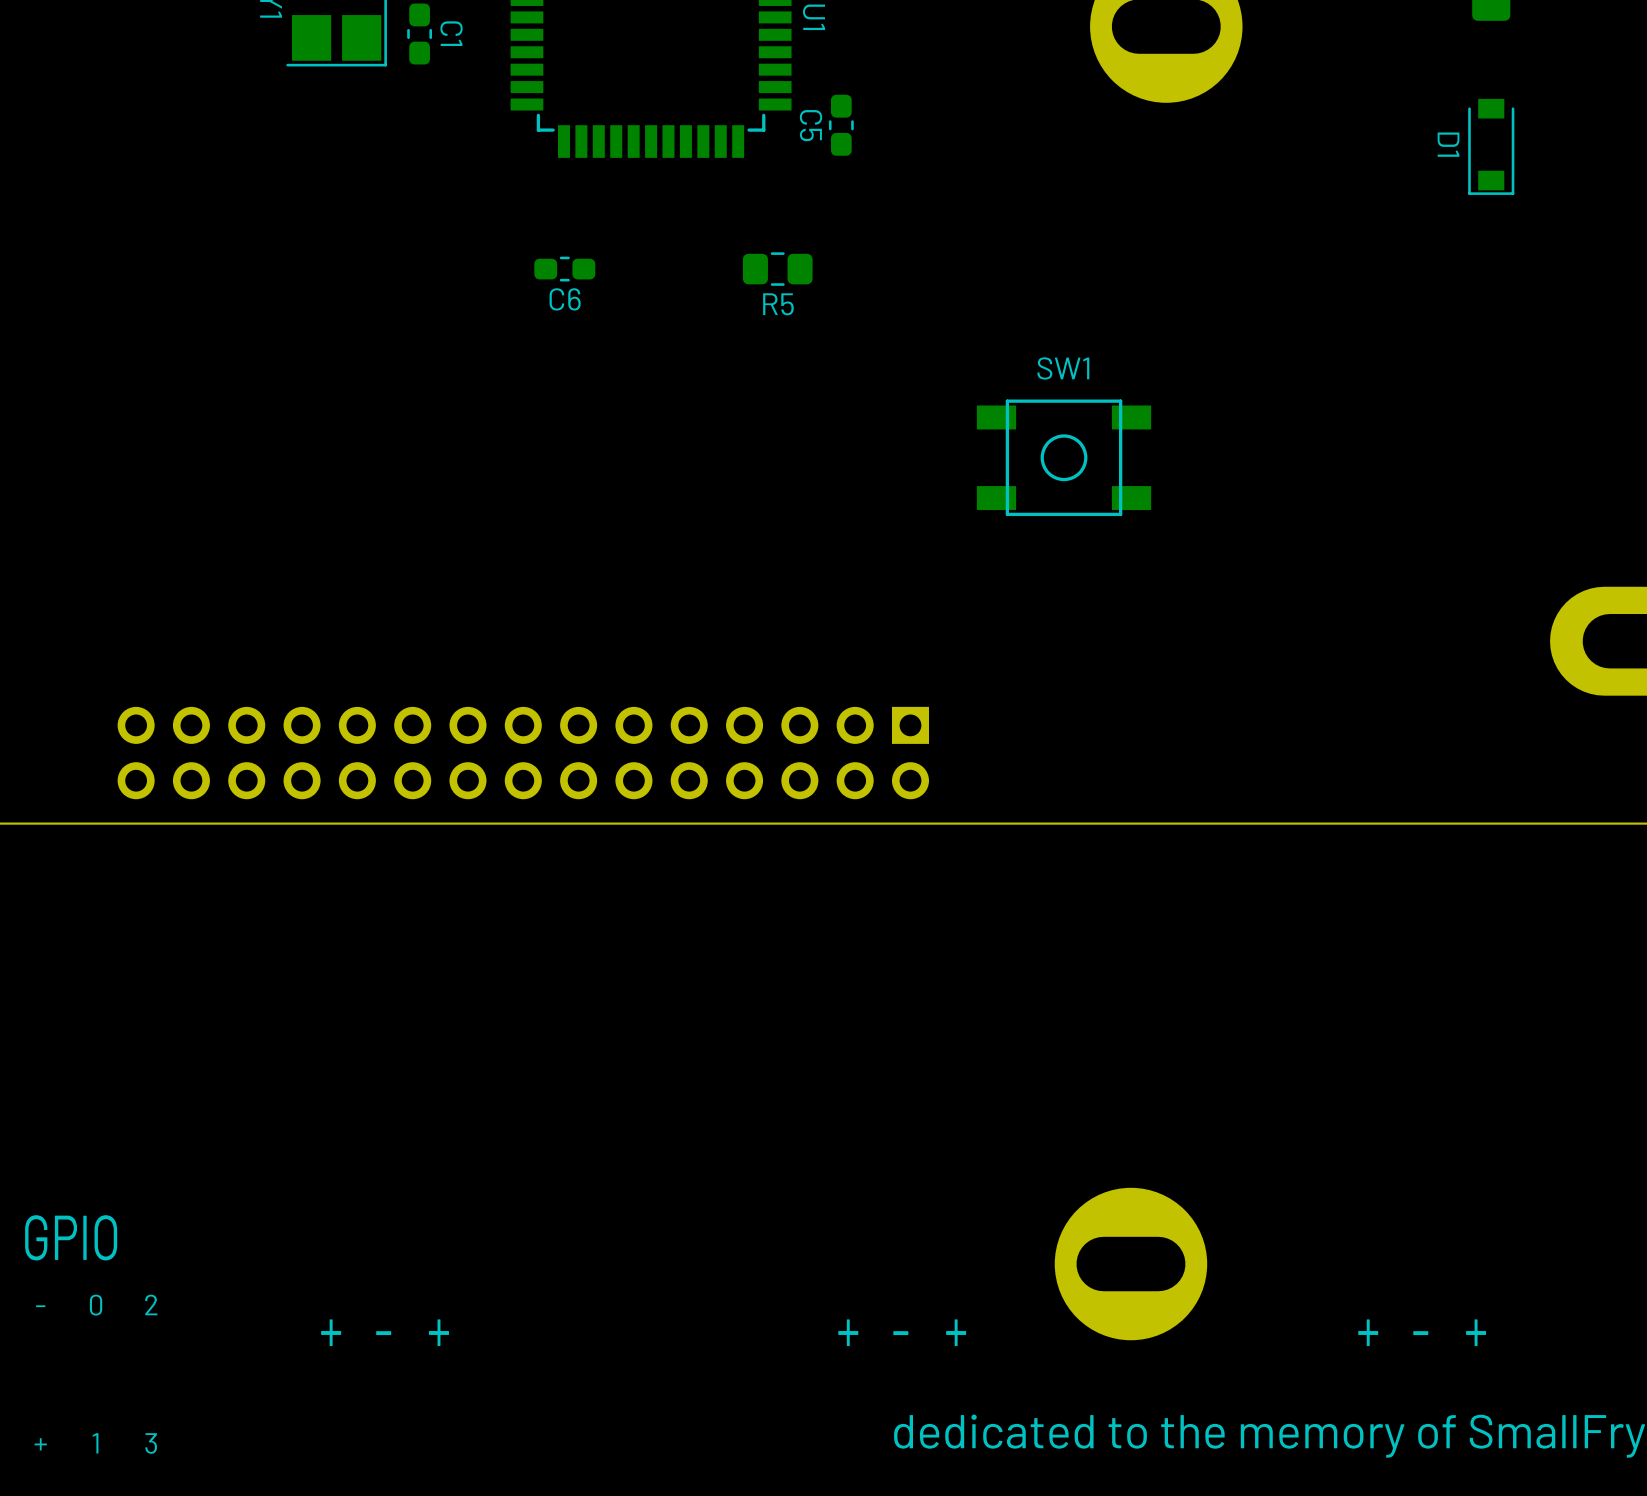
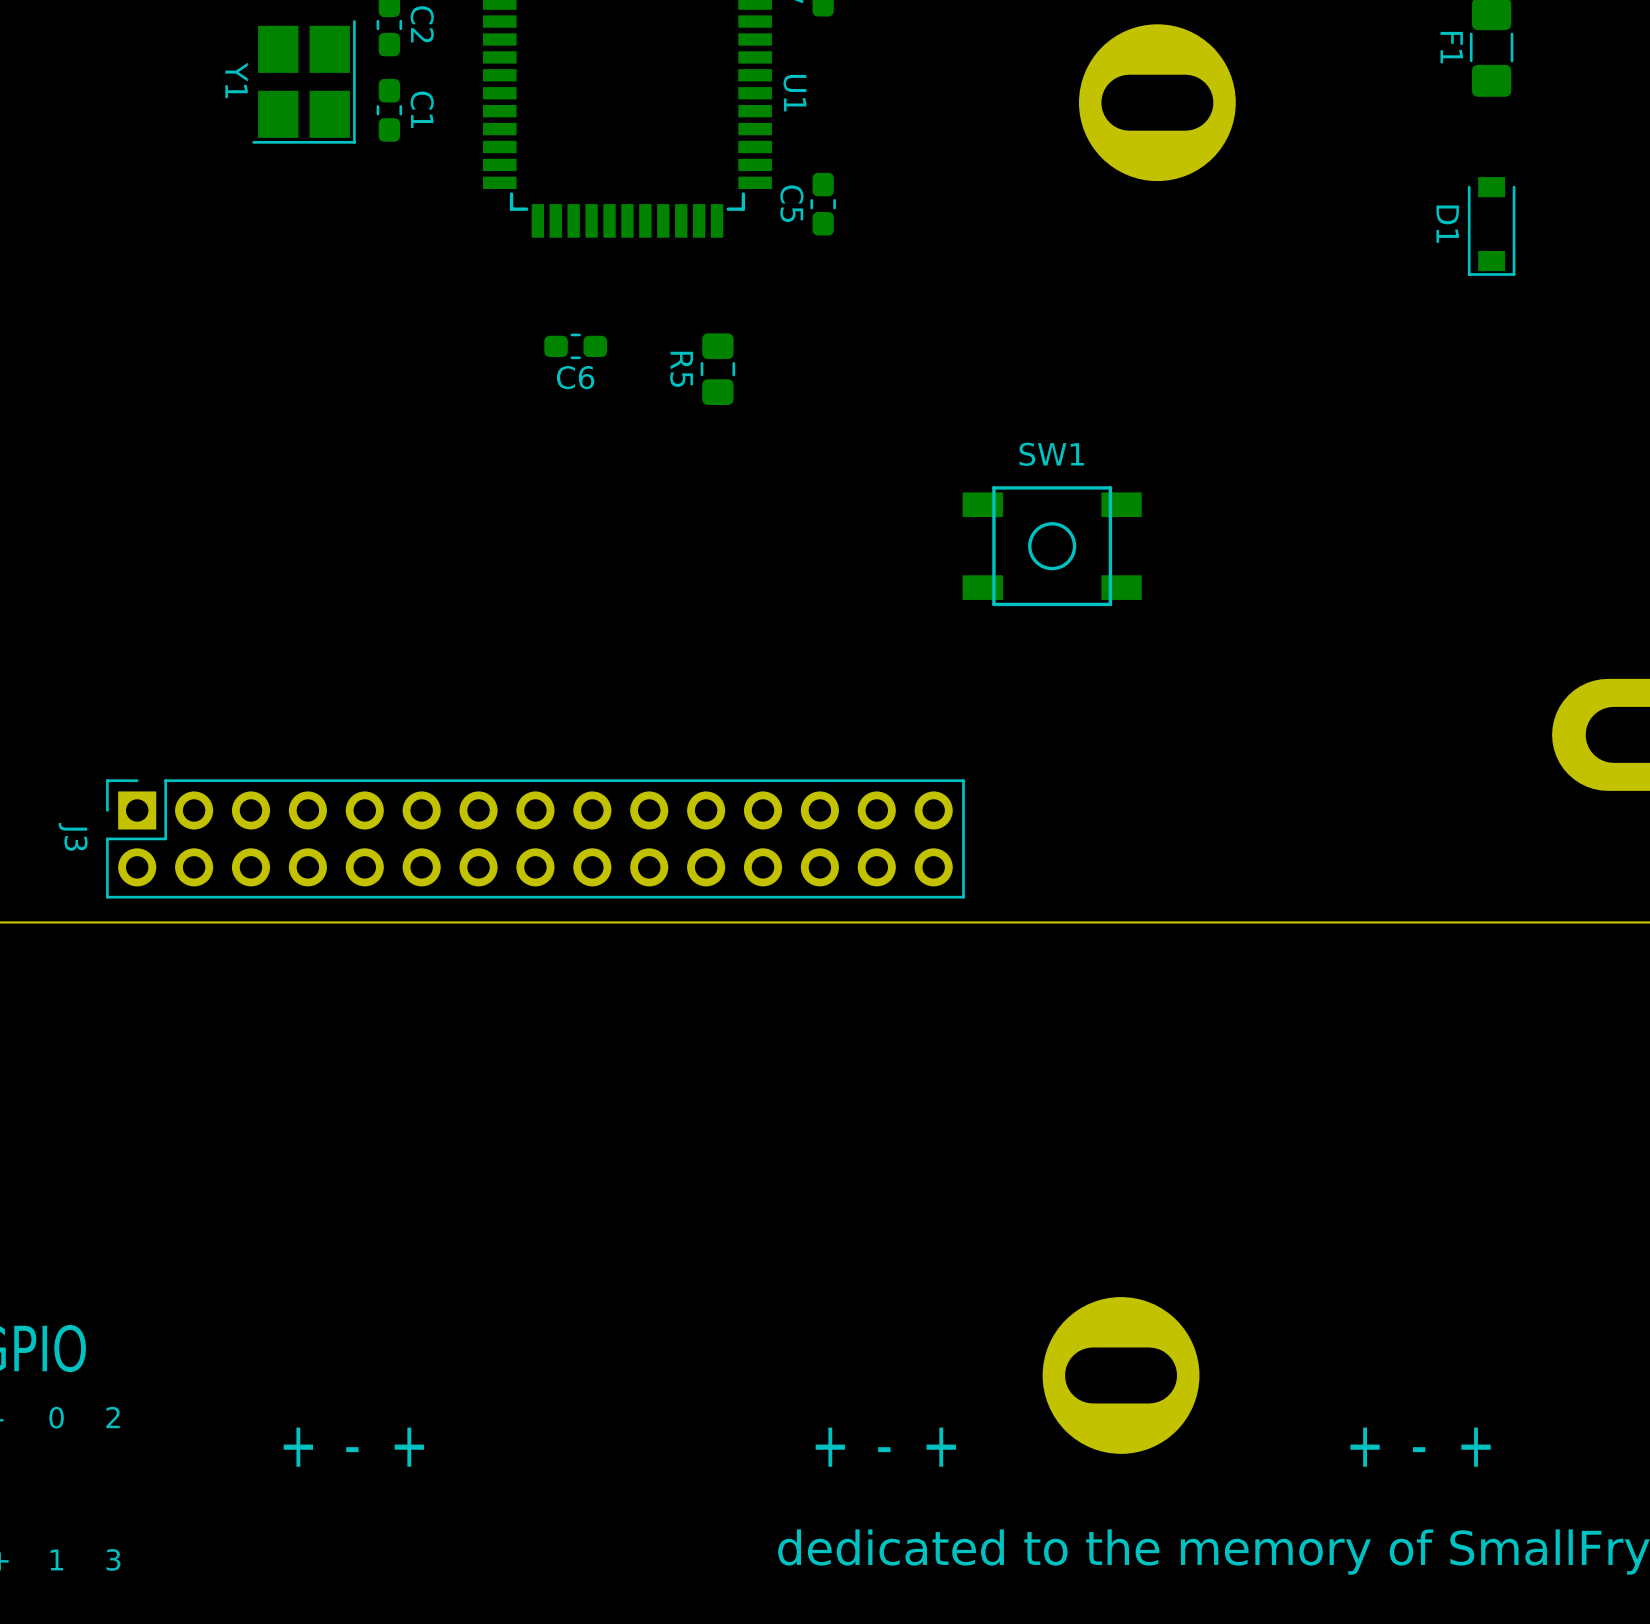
C6 position: (564, 269) -> (575, 346)
R5 rotation: 0° (777, 269) -> 90° clockwise (717, 369)
R5 position: (777, 269) -> (717, 369)
J3 side: top (523, 753) -> bottom (535, 838)

